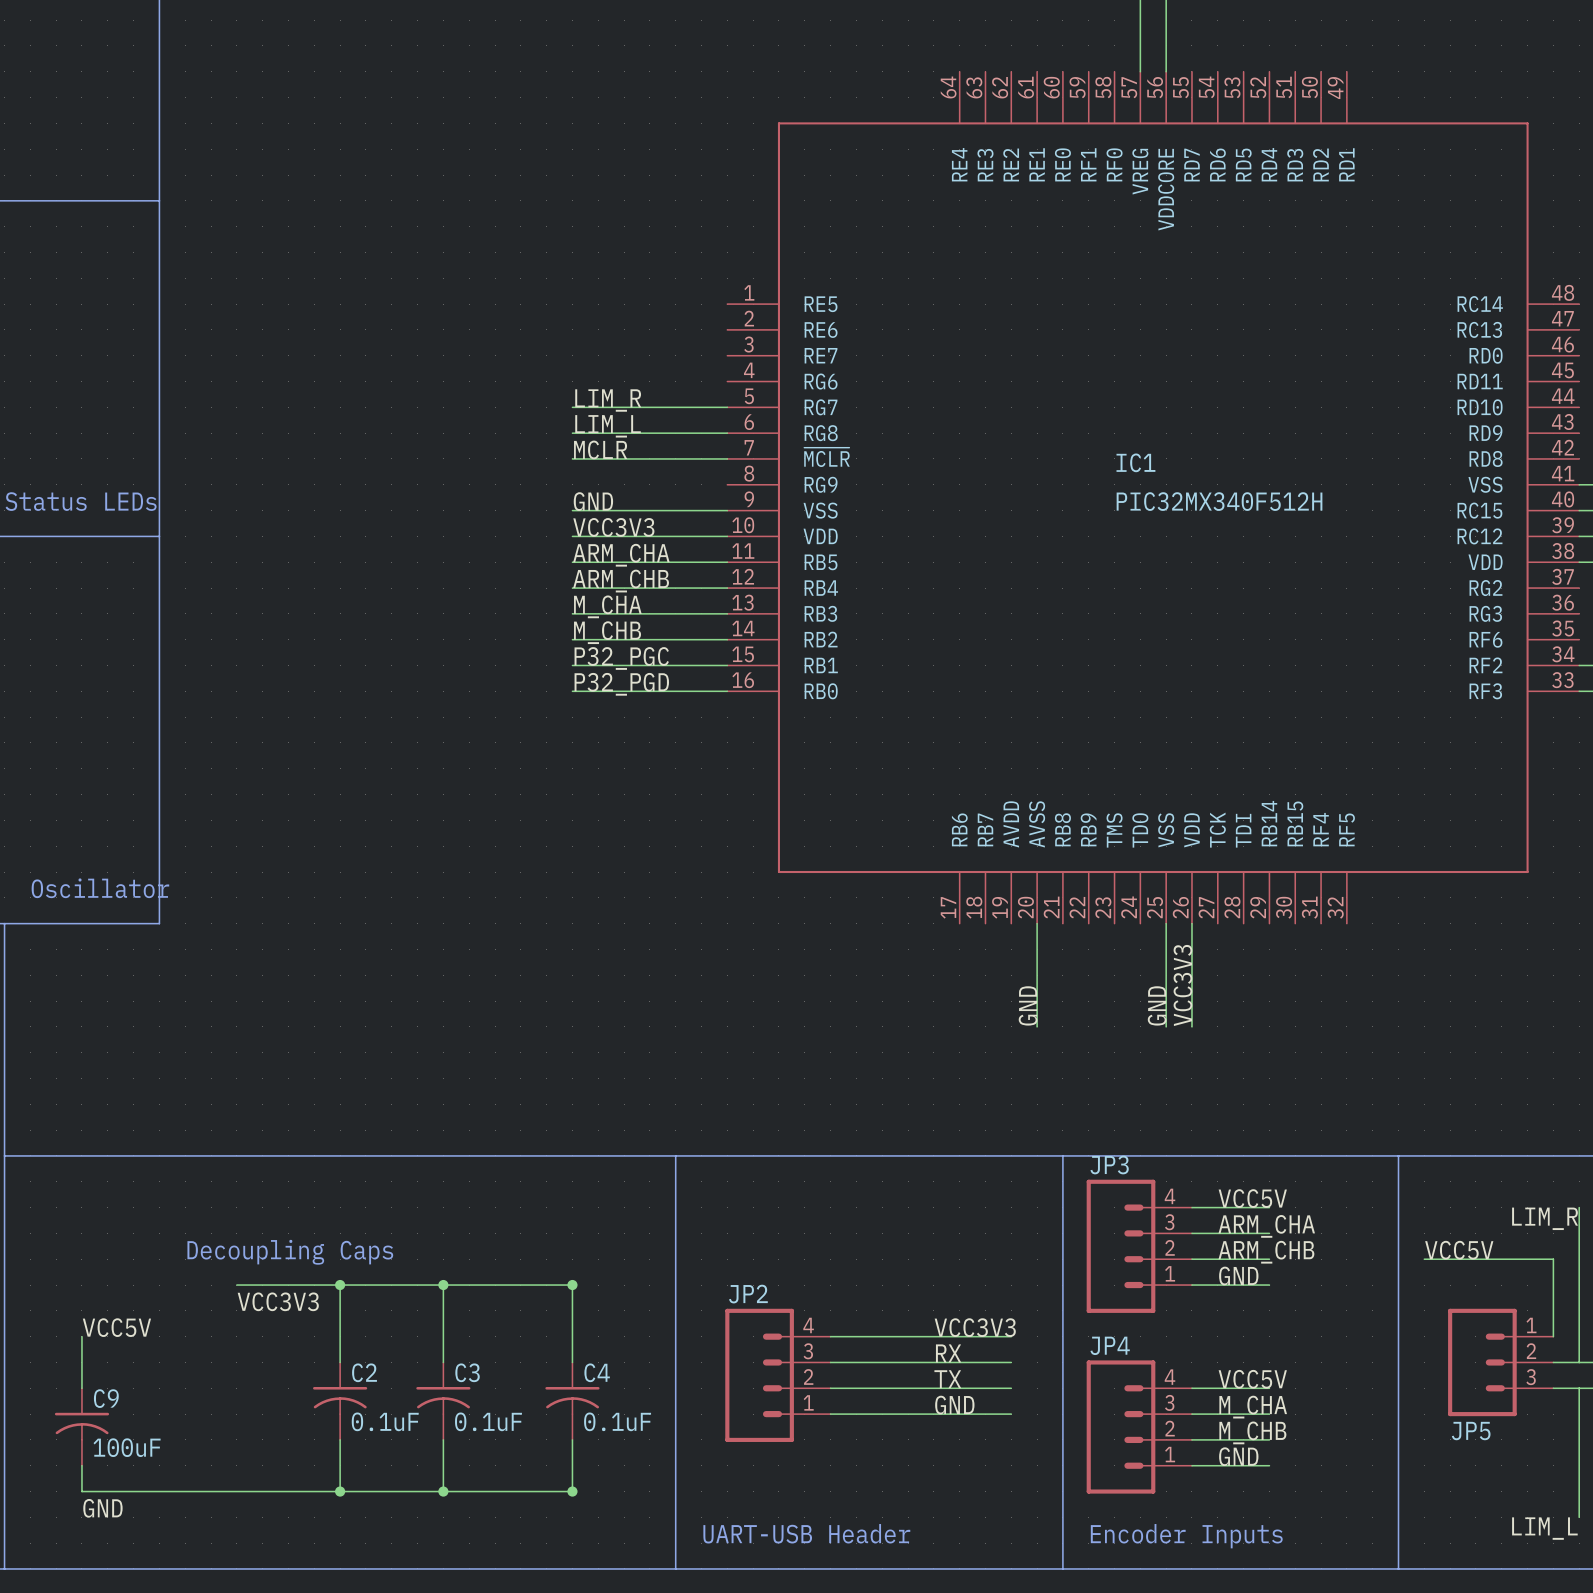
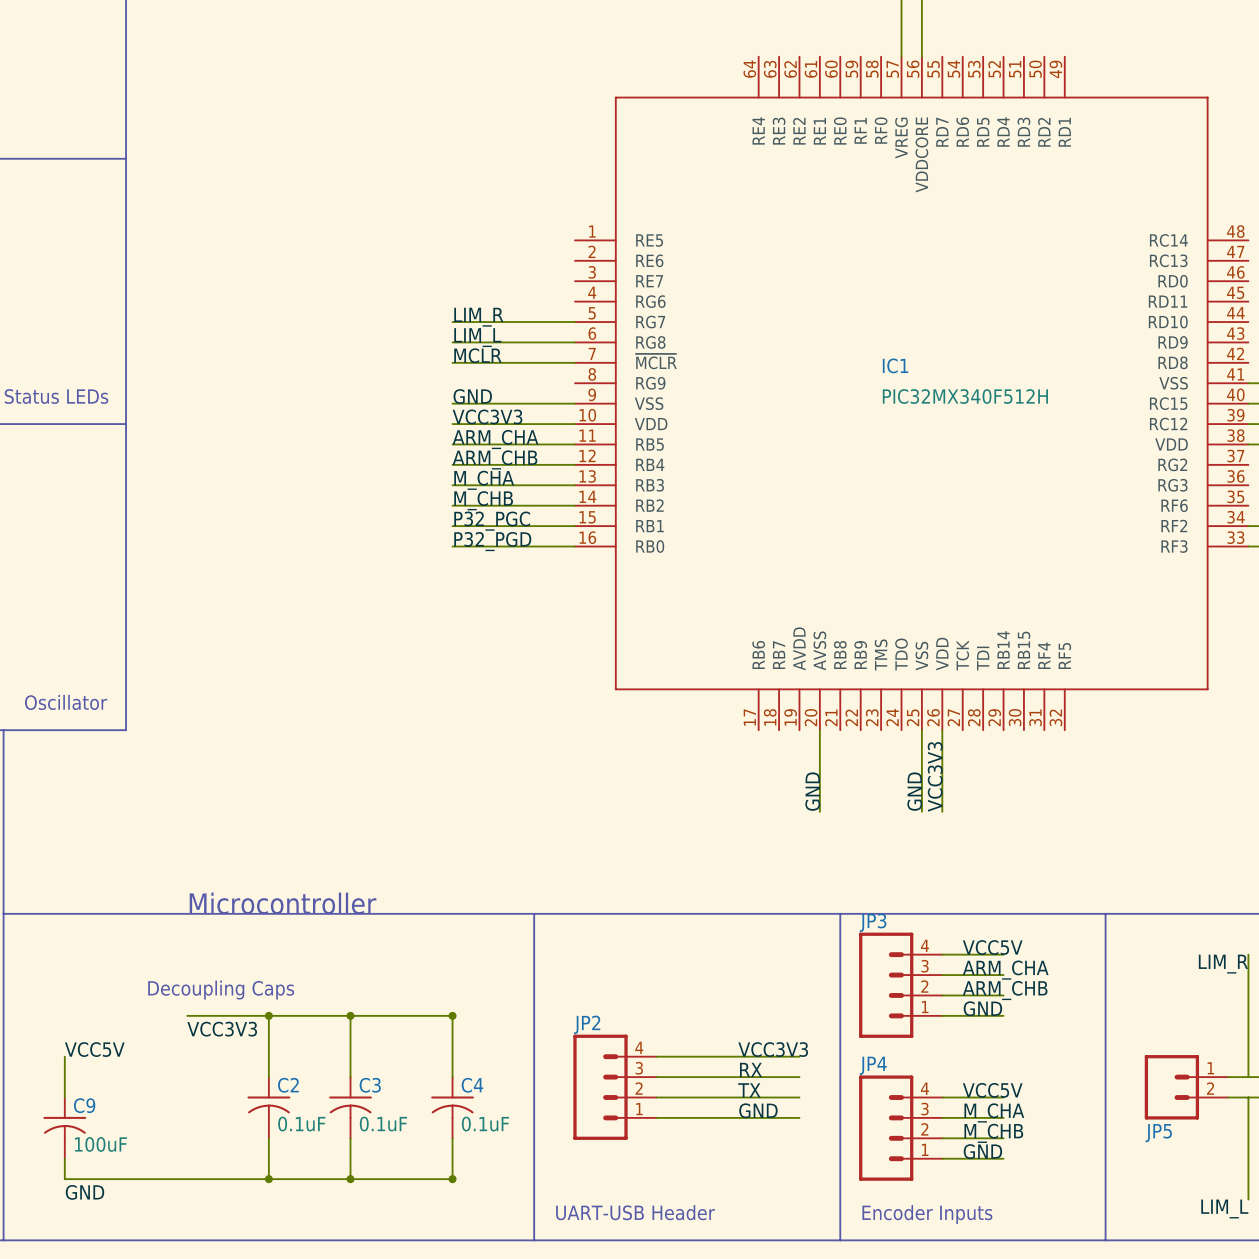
text: none -> Microcontroller (283, 903)
label: VCC5V (1459, 1250) -> none
wire: (1424, 1259) (1553, 1259) (1553, 1336) -> none
JP5 symbol: [1448, 1308, 1554, 1417] -> [1144, 1055, 1229, 1120]

